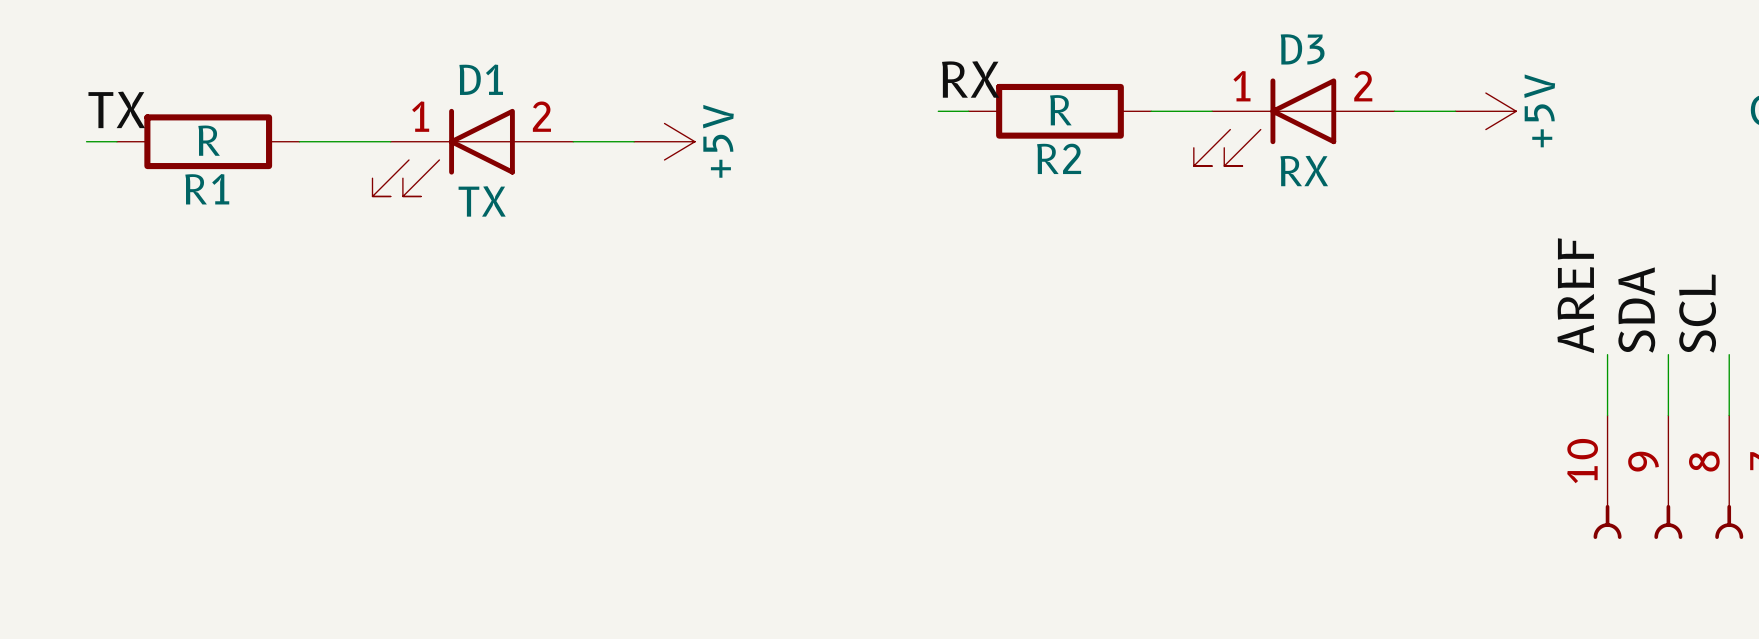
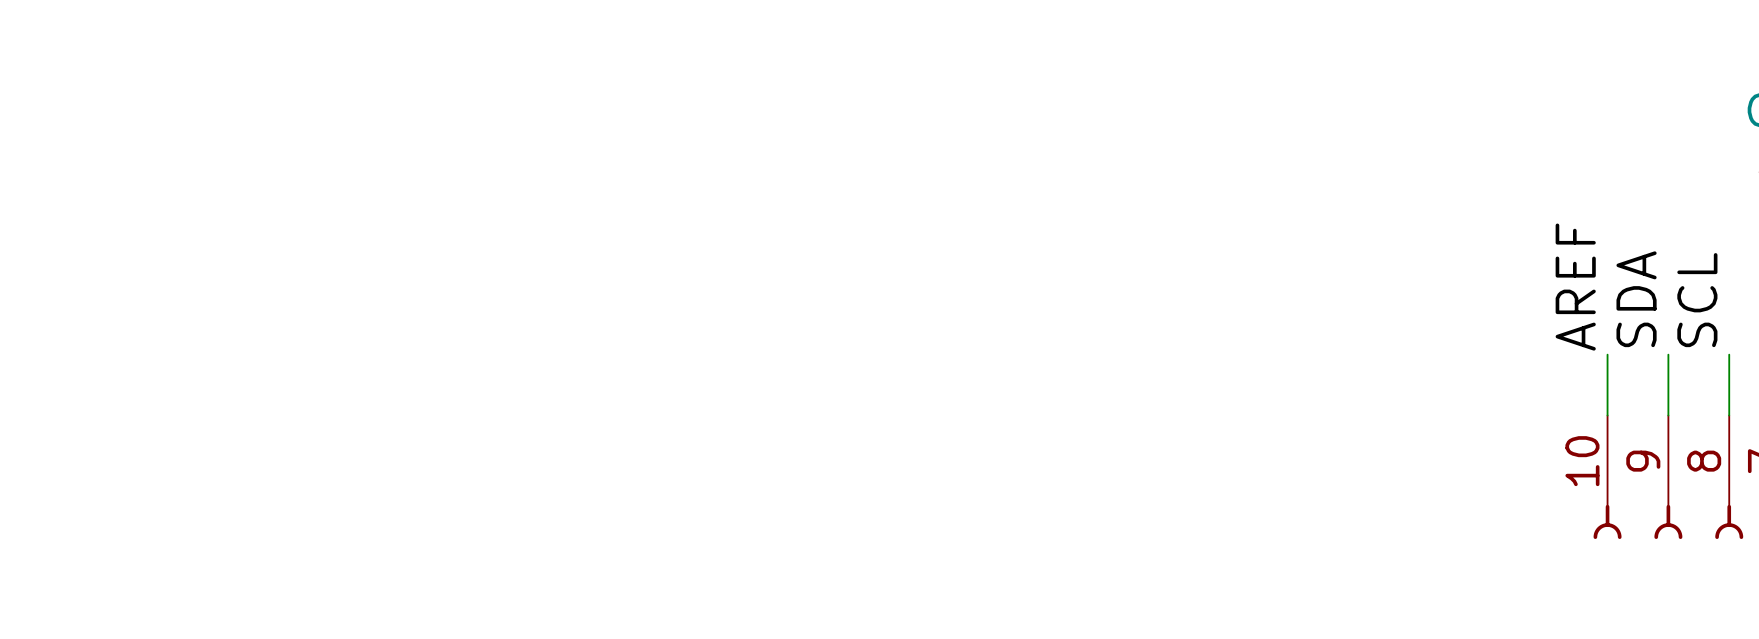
label: RX (970, 79) -> none
label: TX (116, 109) -> none
wire: (938, 111) (968, 111) -> none
R2: R (1059, 111) -> none
wire: (1151, 111) (1212, 111) -> none
wire: (1394, 111) (1455, 111) -> none
power symbol: +5V (1485, 111) -> none
D3: RX (1294, 122) -> none
wire: (86, 141) (116, 141) -> none
R1: R (208, 141) -> none
wire: (299, 141) (390, 141) -> none
wire: (573, 141) (634, 141) -> none
power symbol: +5V (664, 141) -> none
D1: TX (472, 152) -> none

